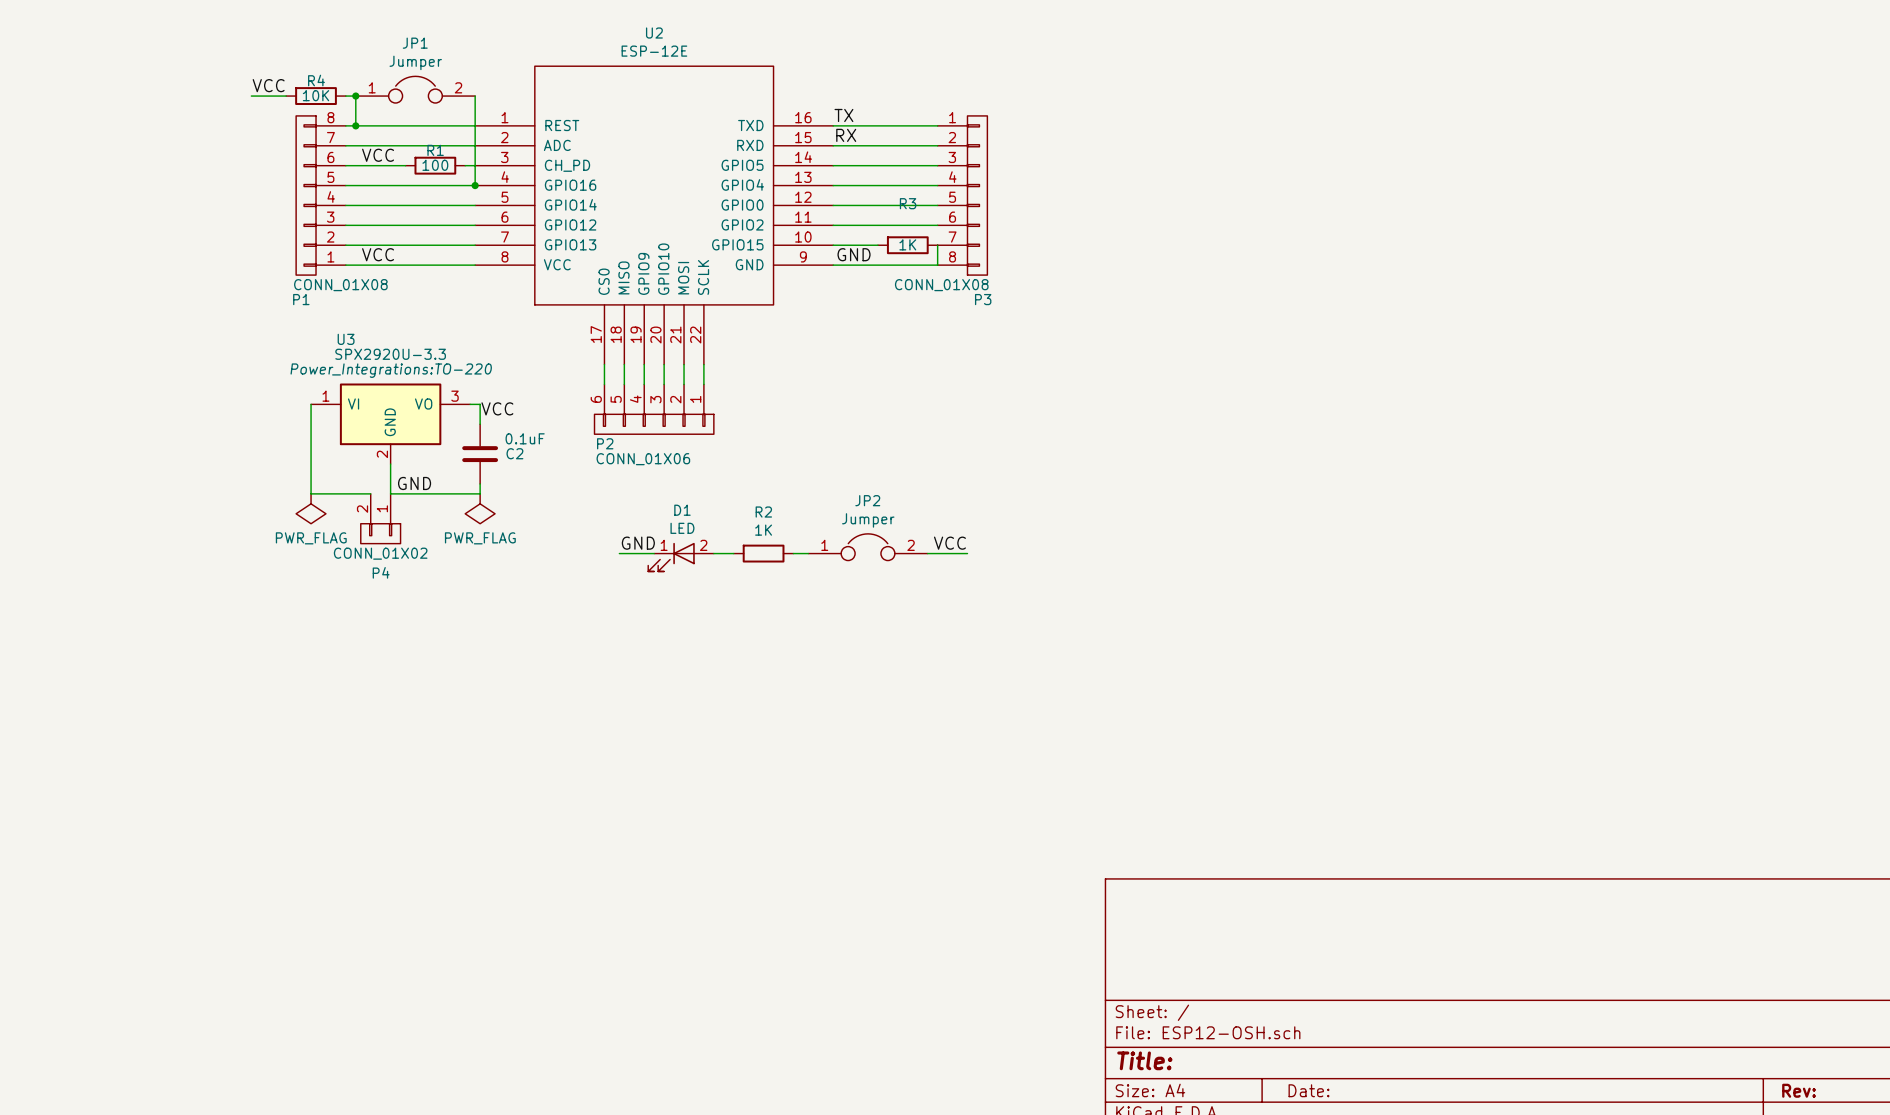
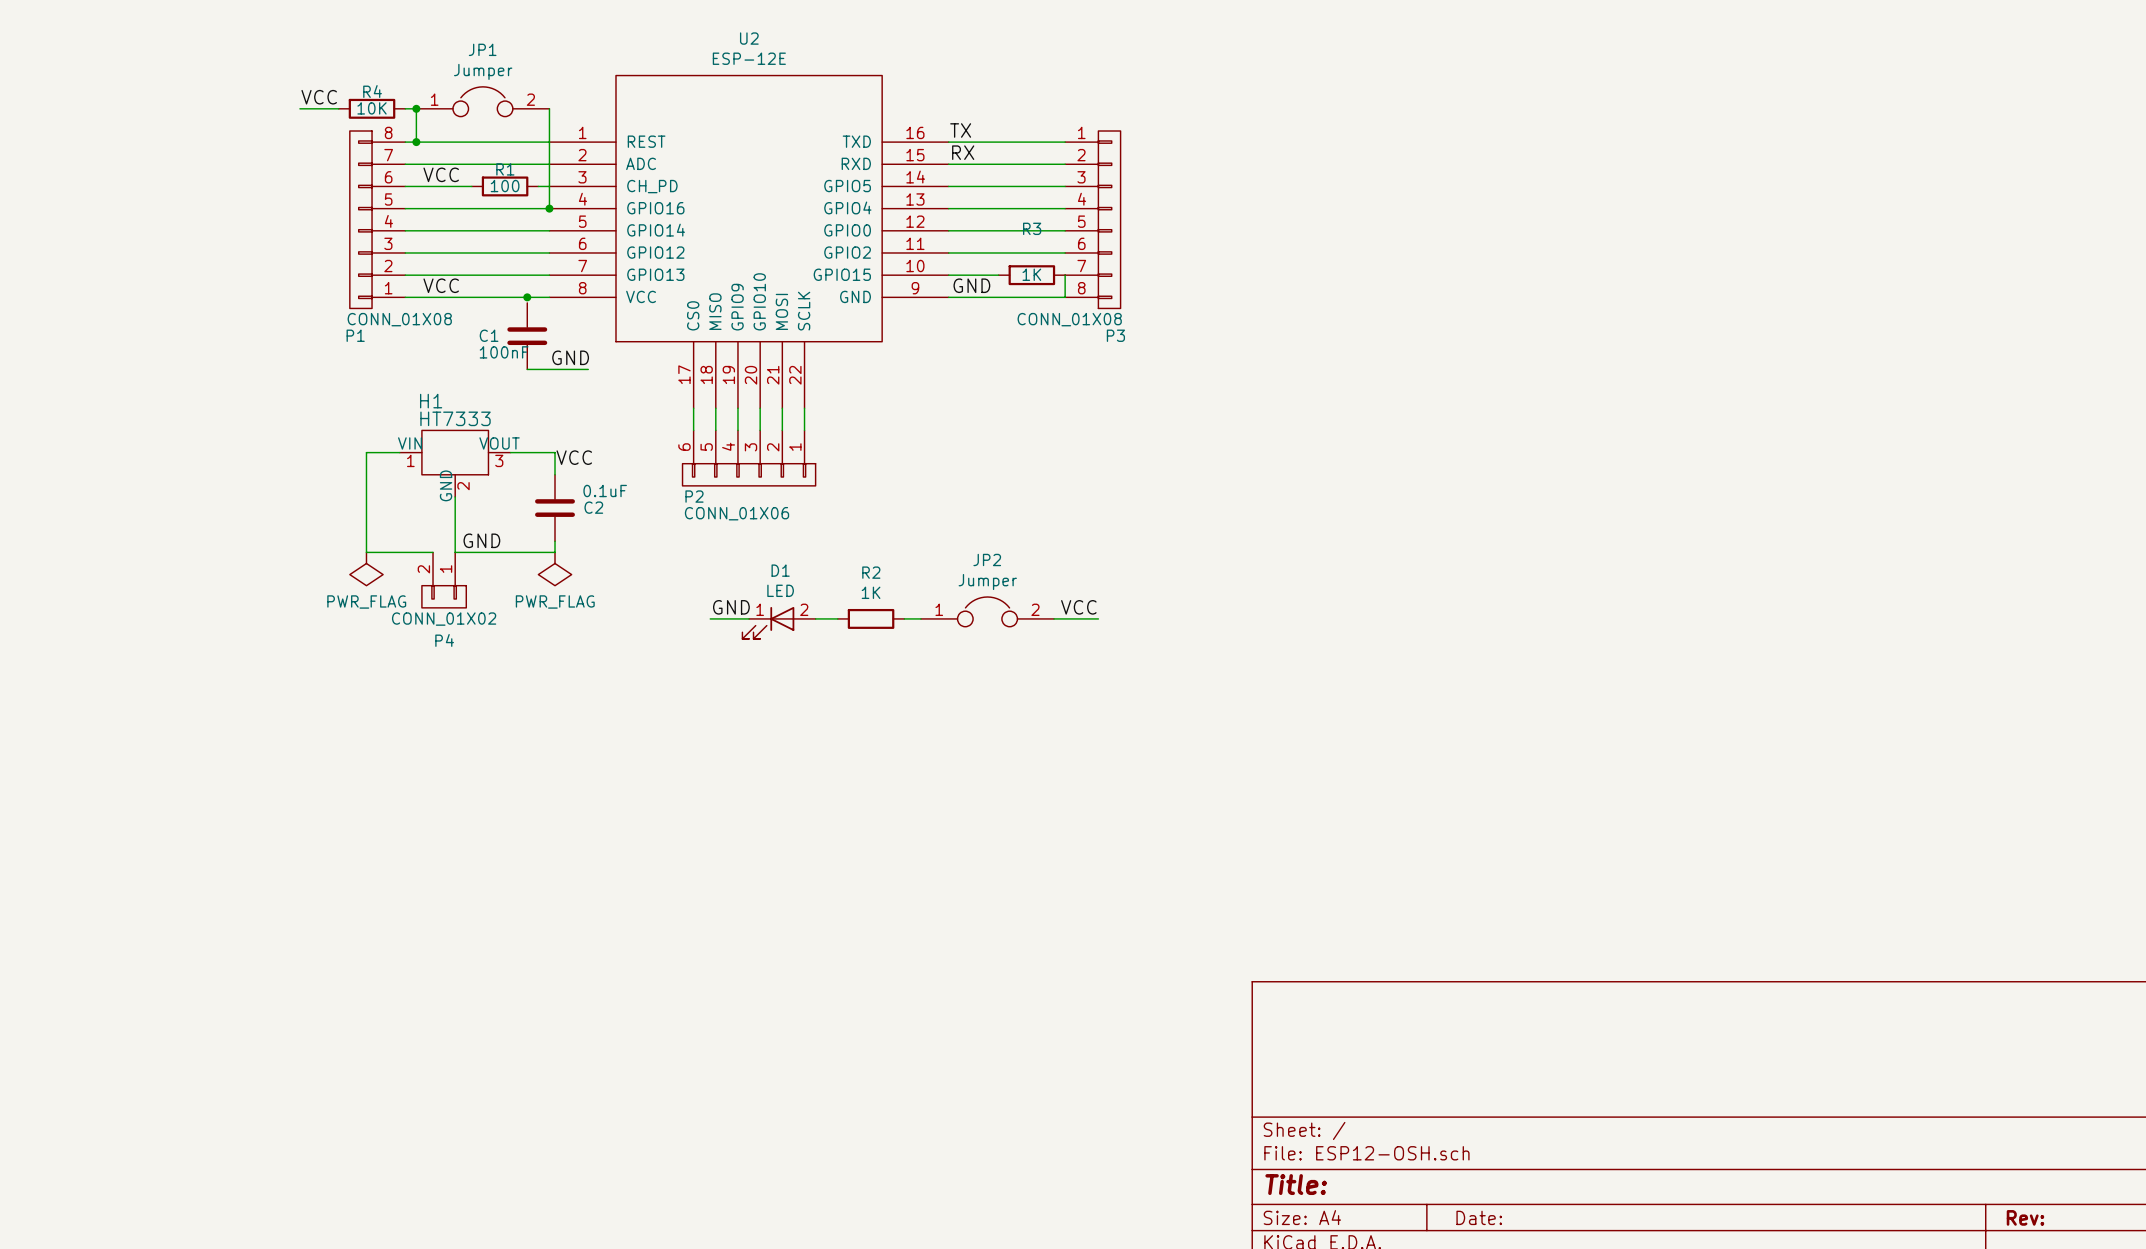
junction: none -> (527, 297)
C1: none -> 100nF (527, 336)
label: none -> GND (570, 357)
wire: none -> (527, 369) (588, 369)
H1: none -> HT7333 (455, 463)
U3: SPX2920U-3.3 (390, 423) -> none

